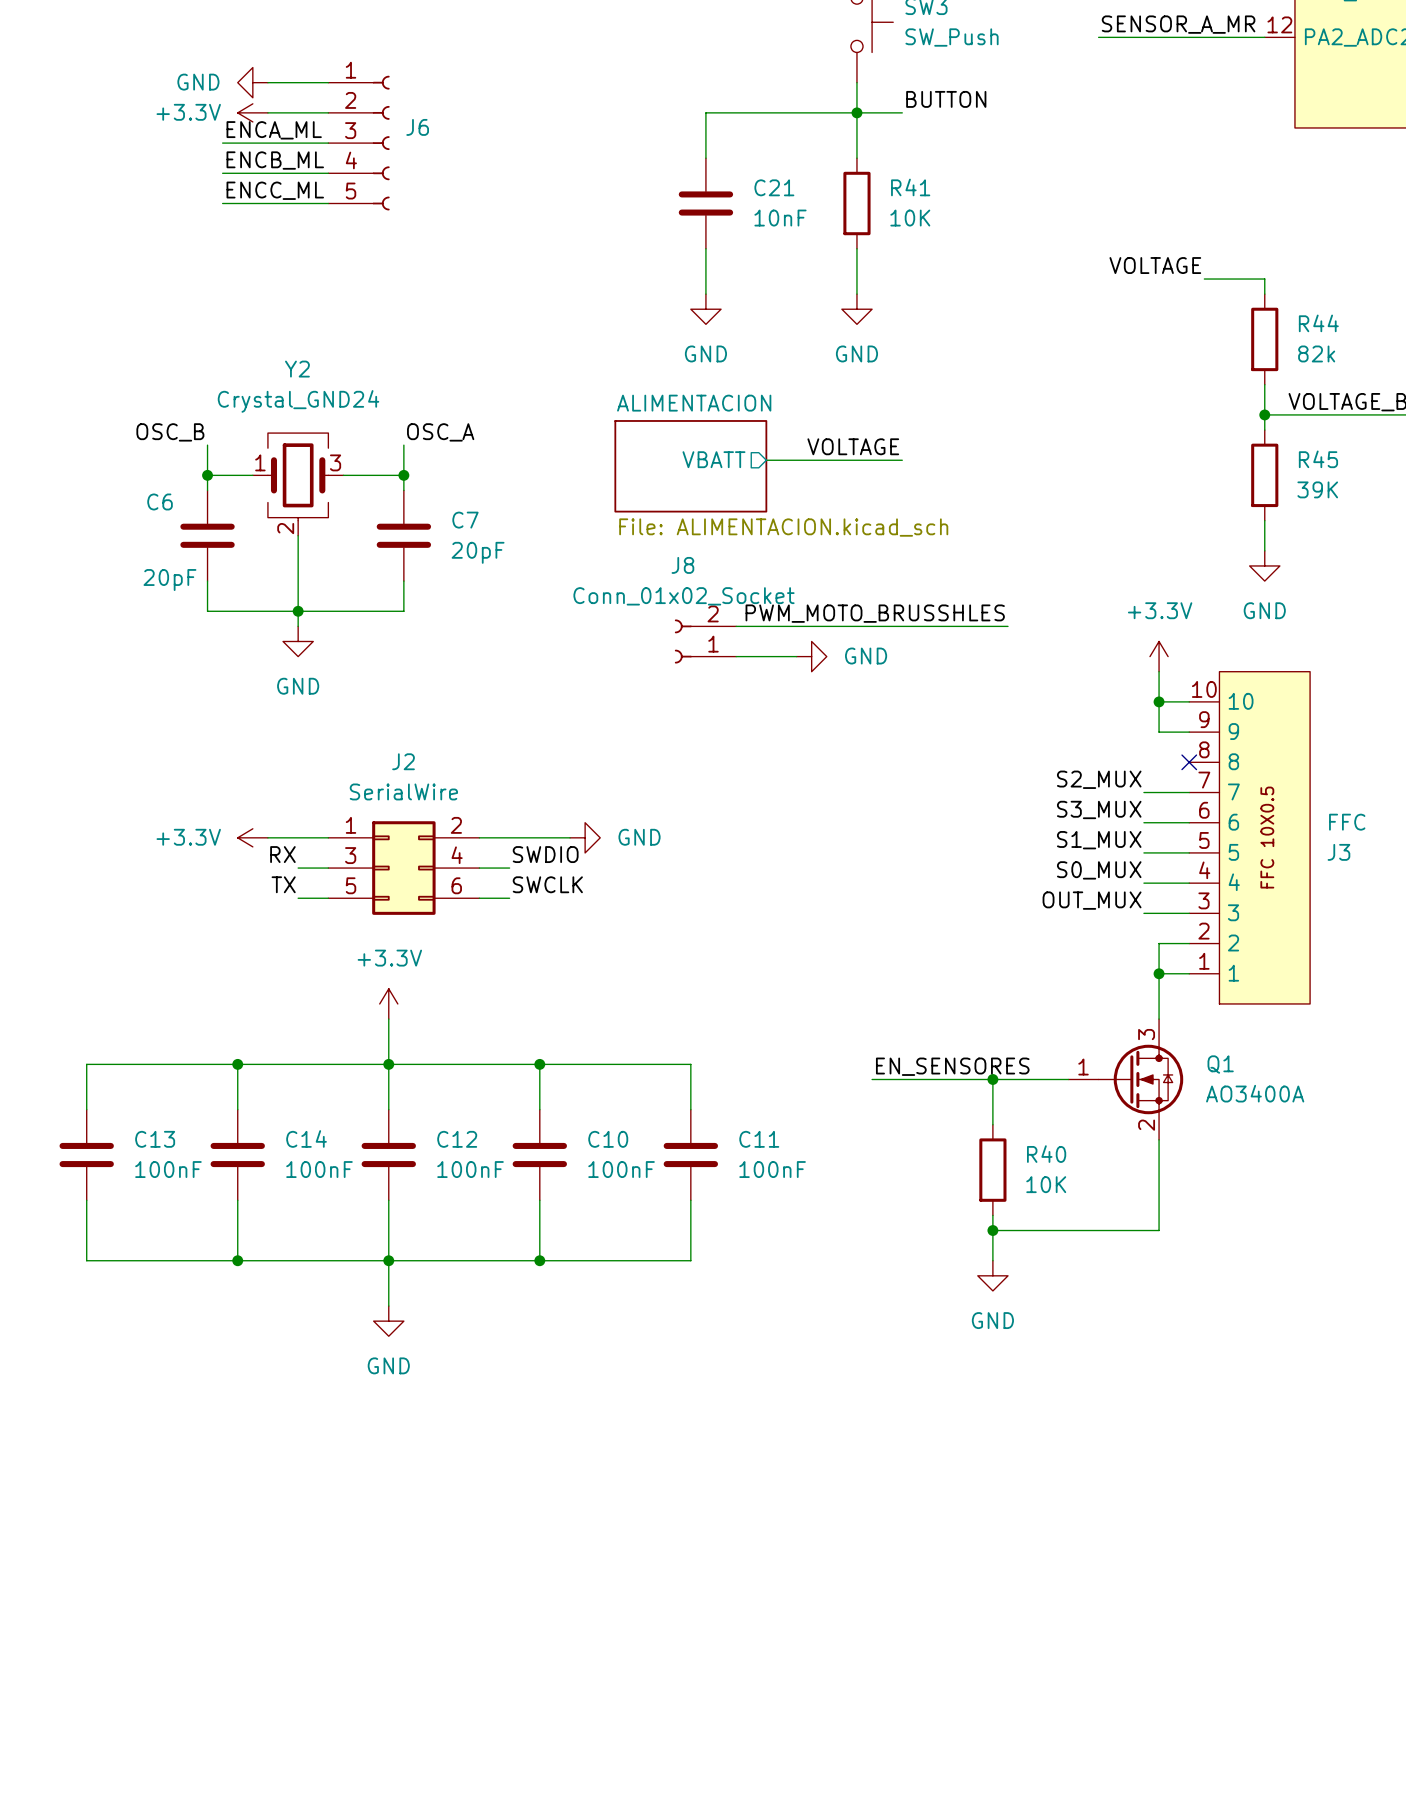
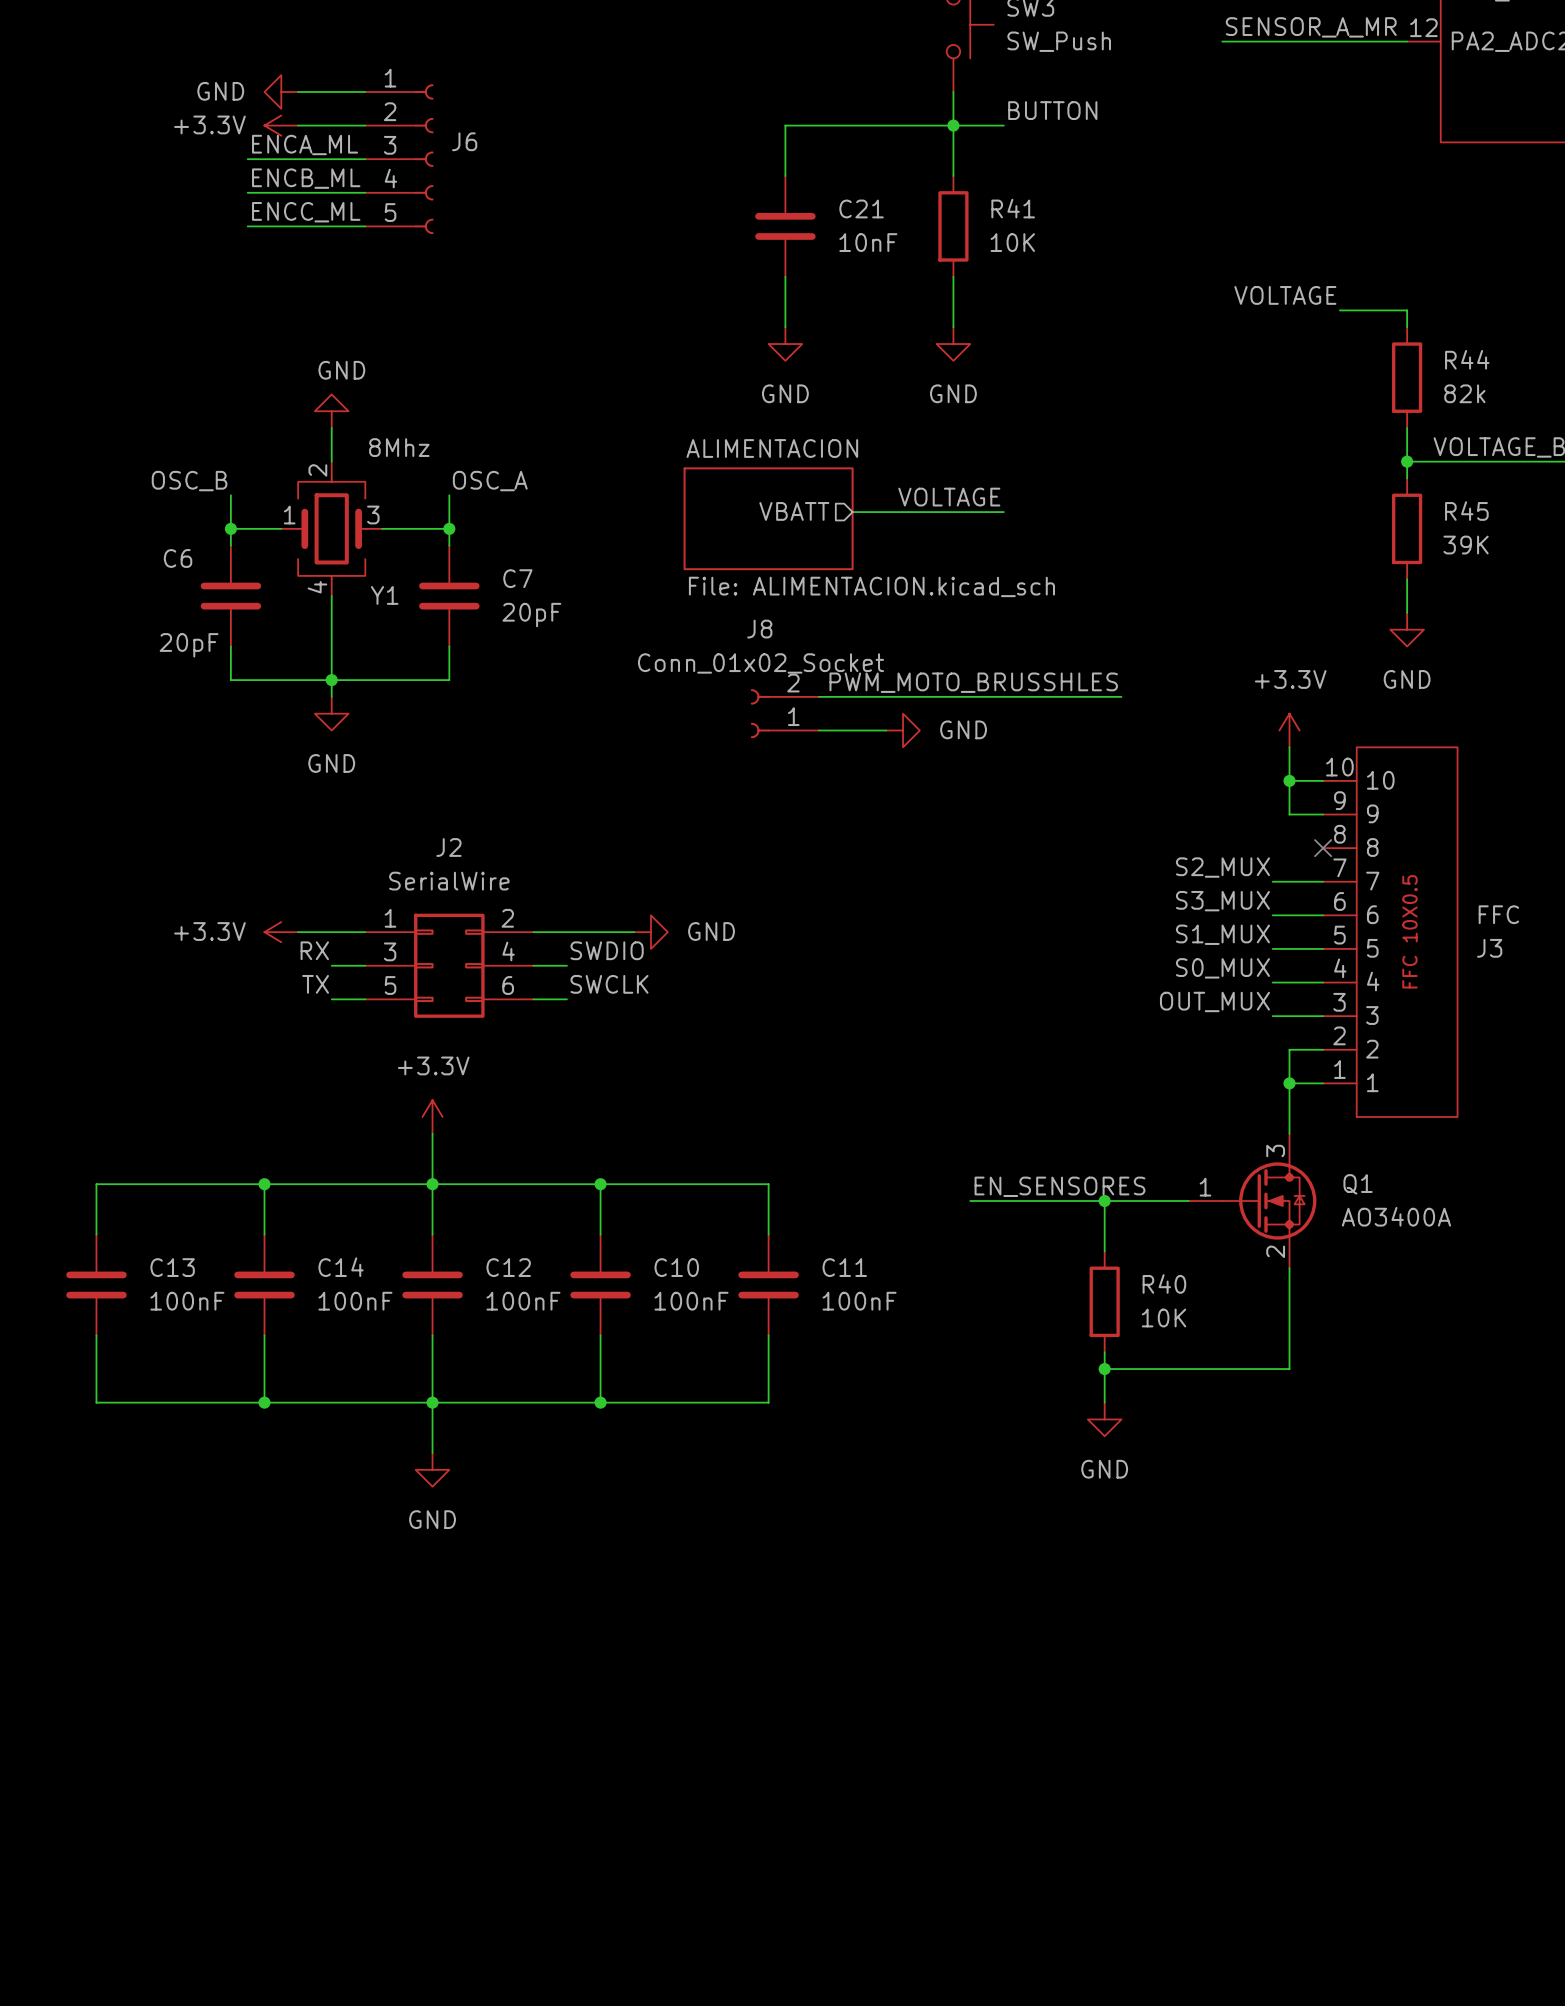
power symbol: none -> GND (331, 411)
wire: none -> (331, 428) (331, 461)
Y1: none -> 8Mhz (331, 528)
Y2: Crystal_GND24 (298, 484) -> none

